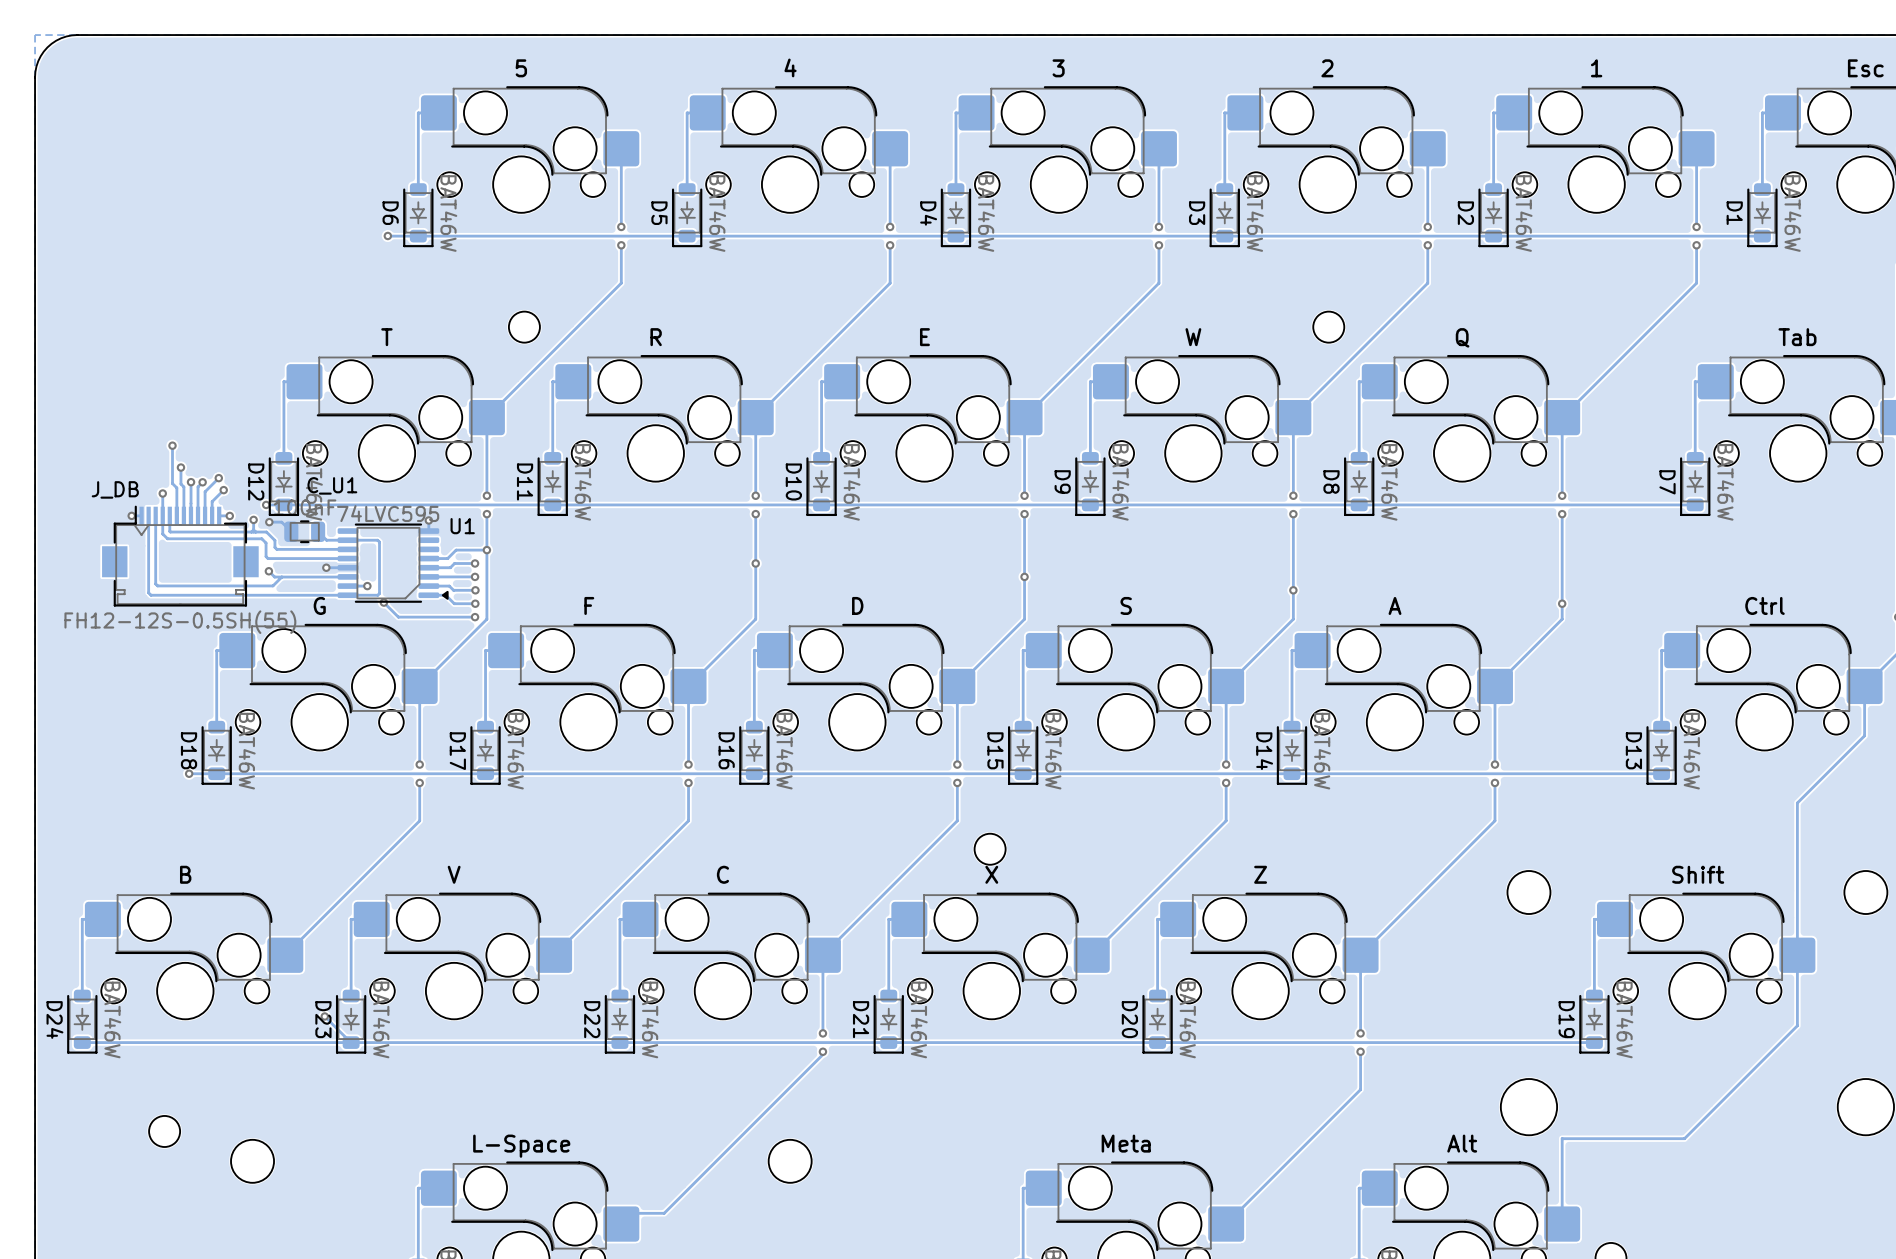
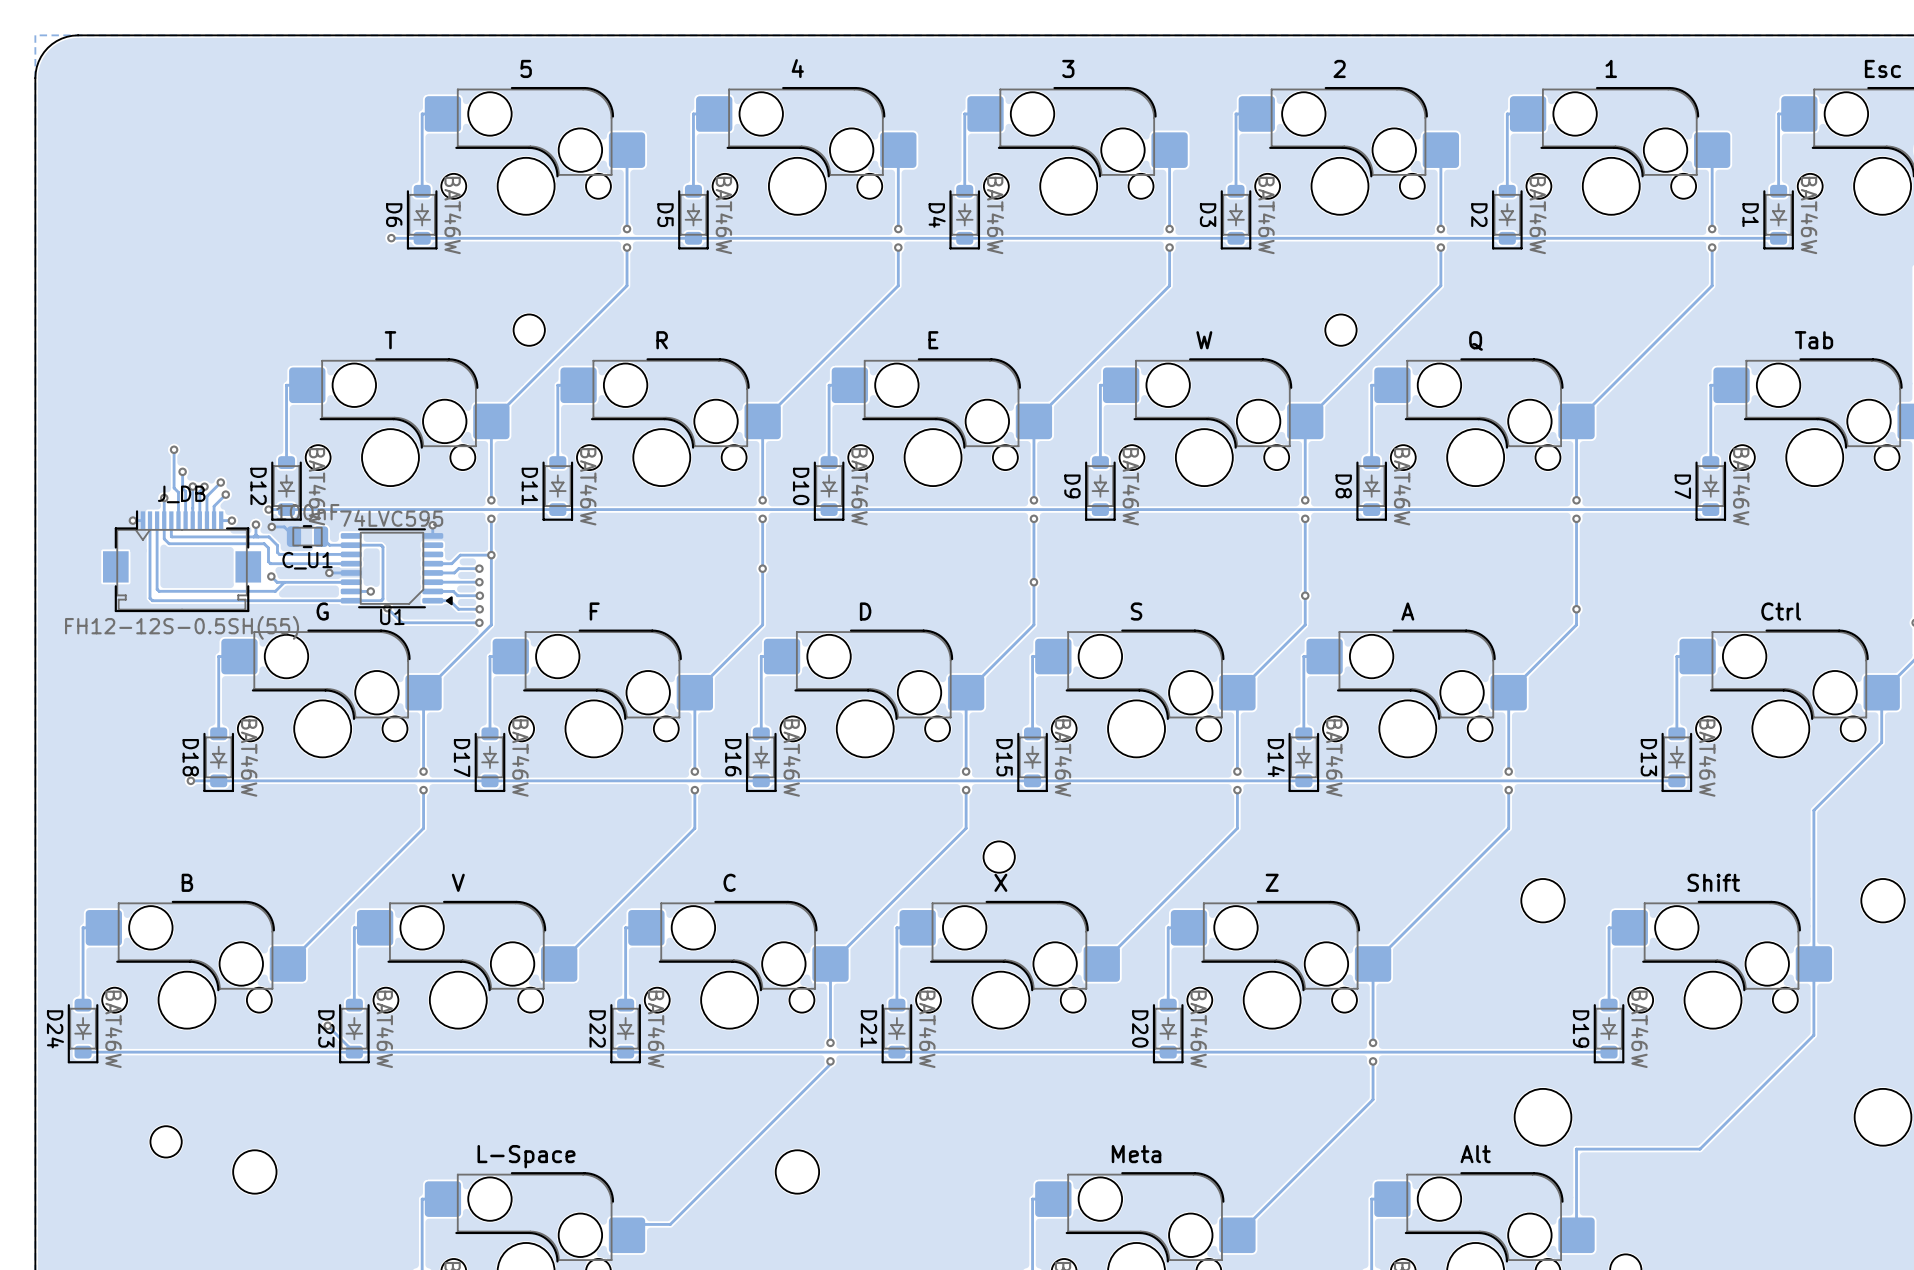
C_U1 name position: C_U1 (332, 485) -> C_U1 (307, 560)
J_DB name position: J_DB (115, 489) -> J_DB (181, 494)
U1 name position: U1 (462, 526) -> U1 (392, 616)

